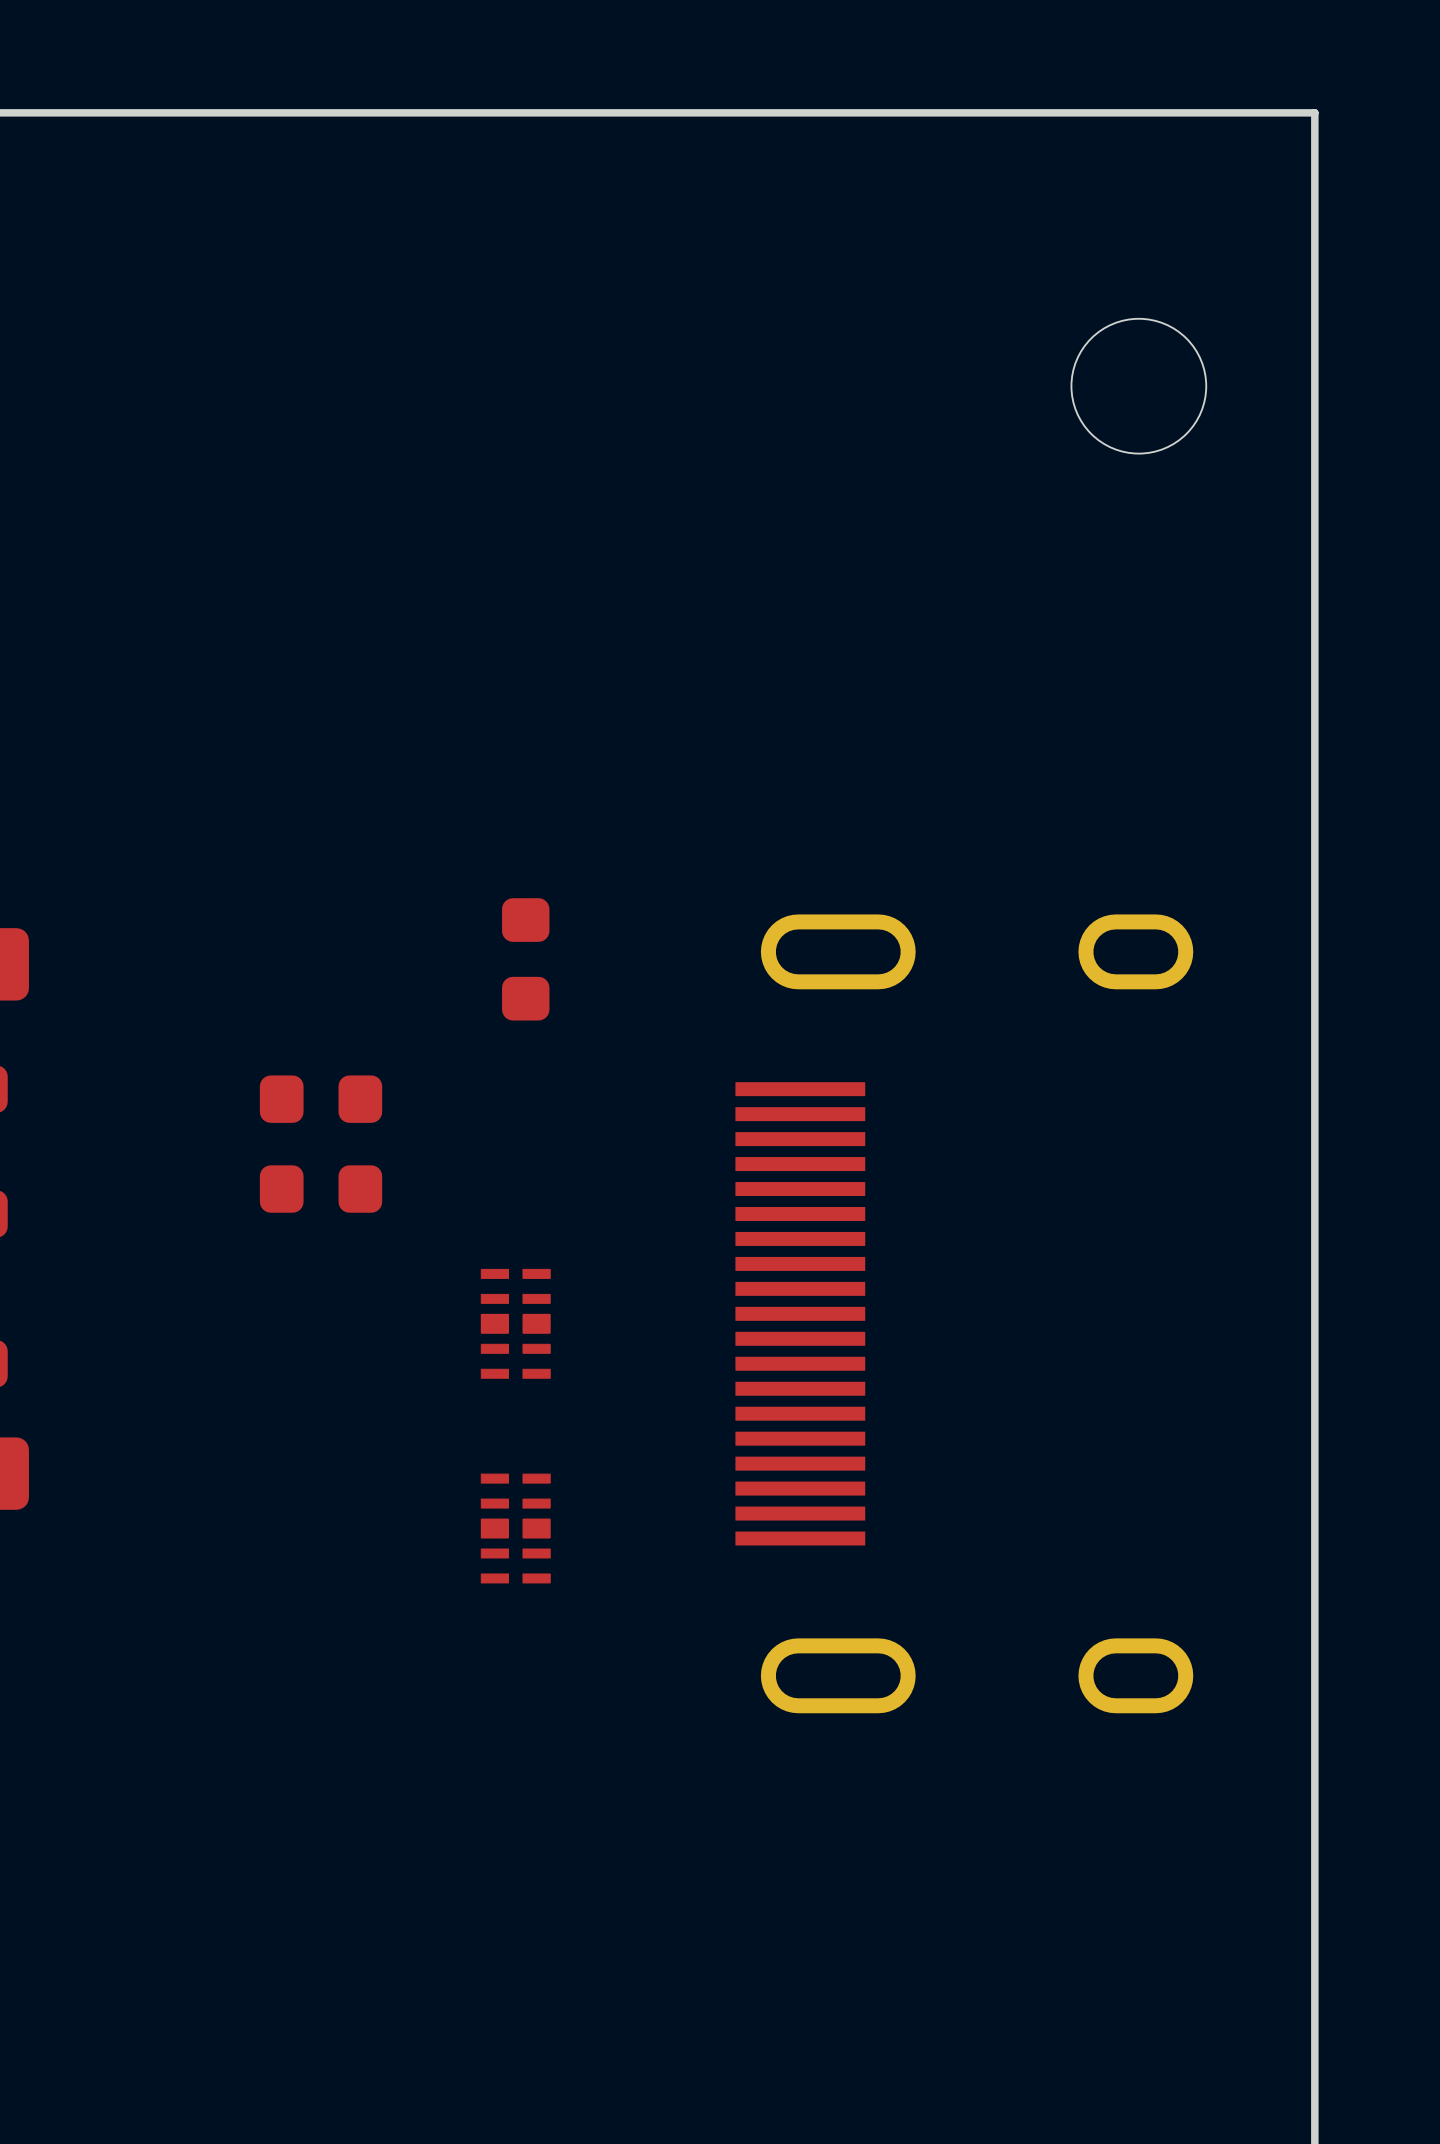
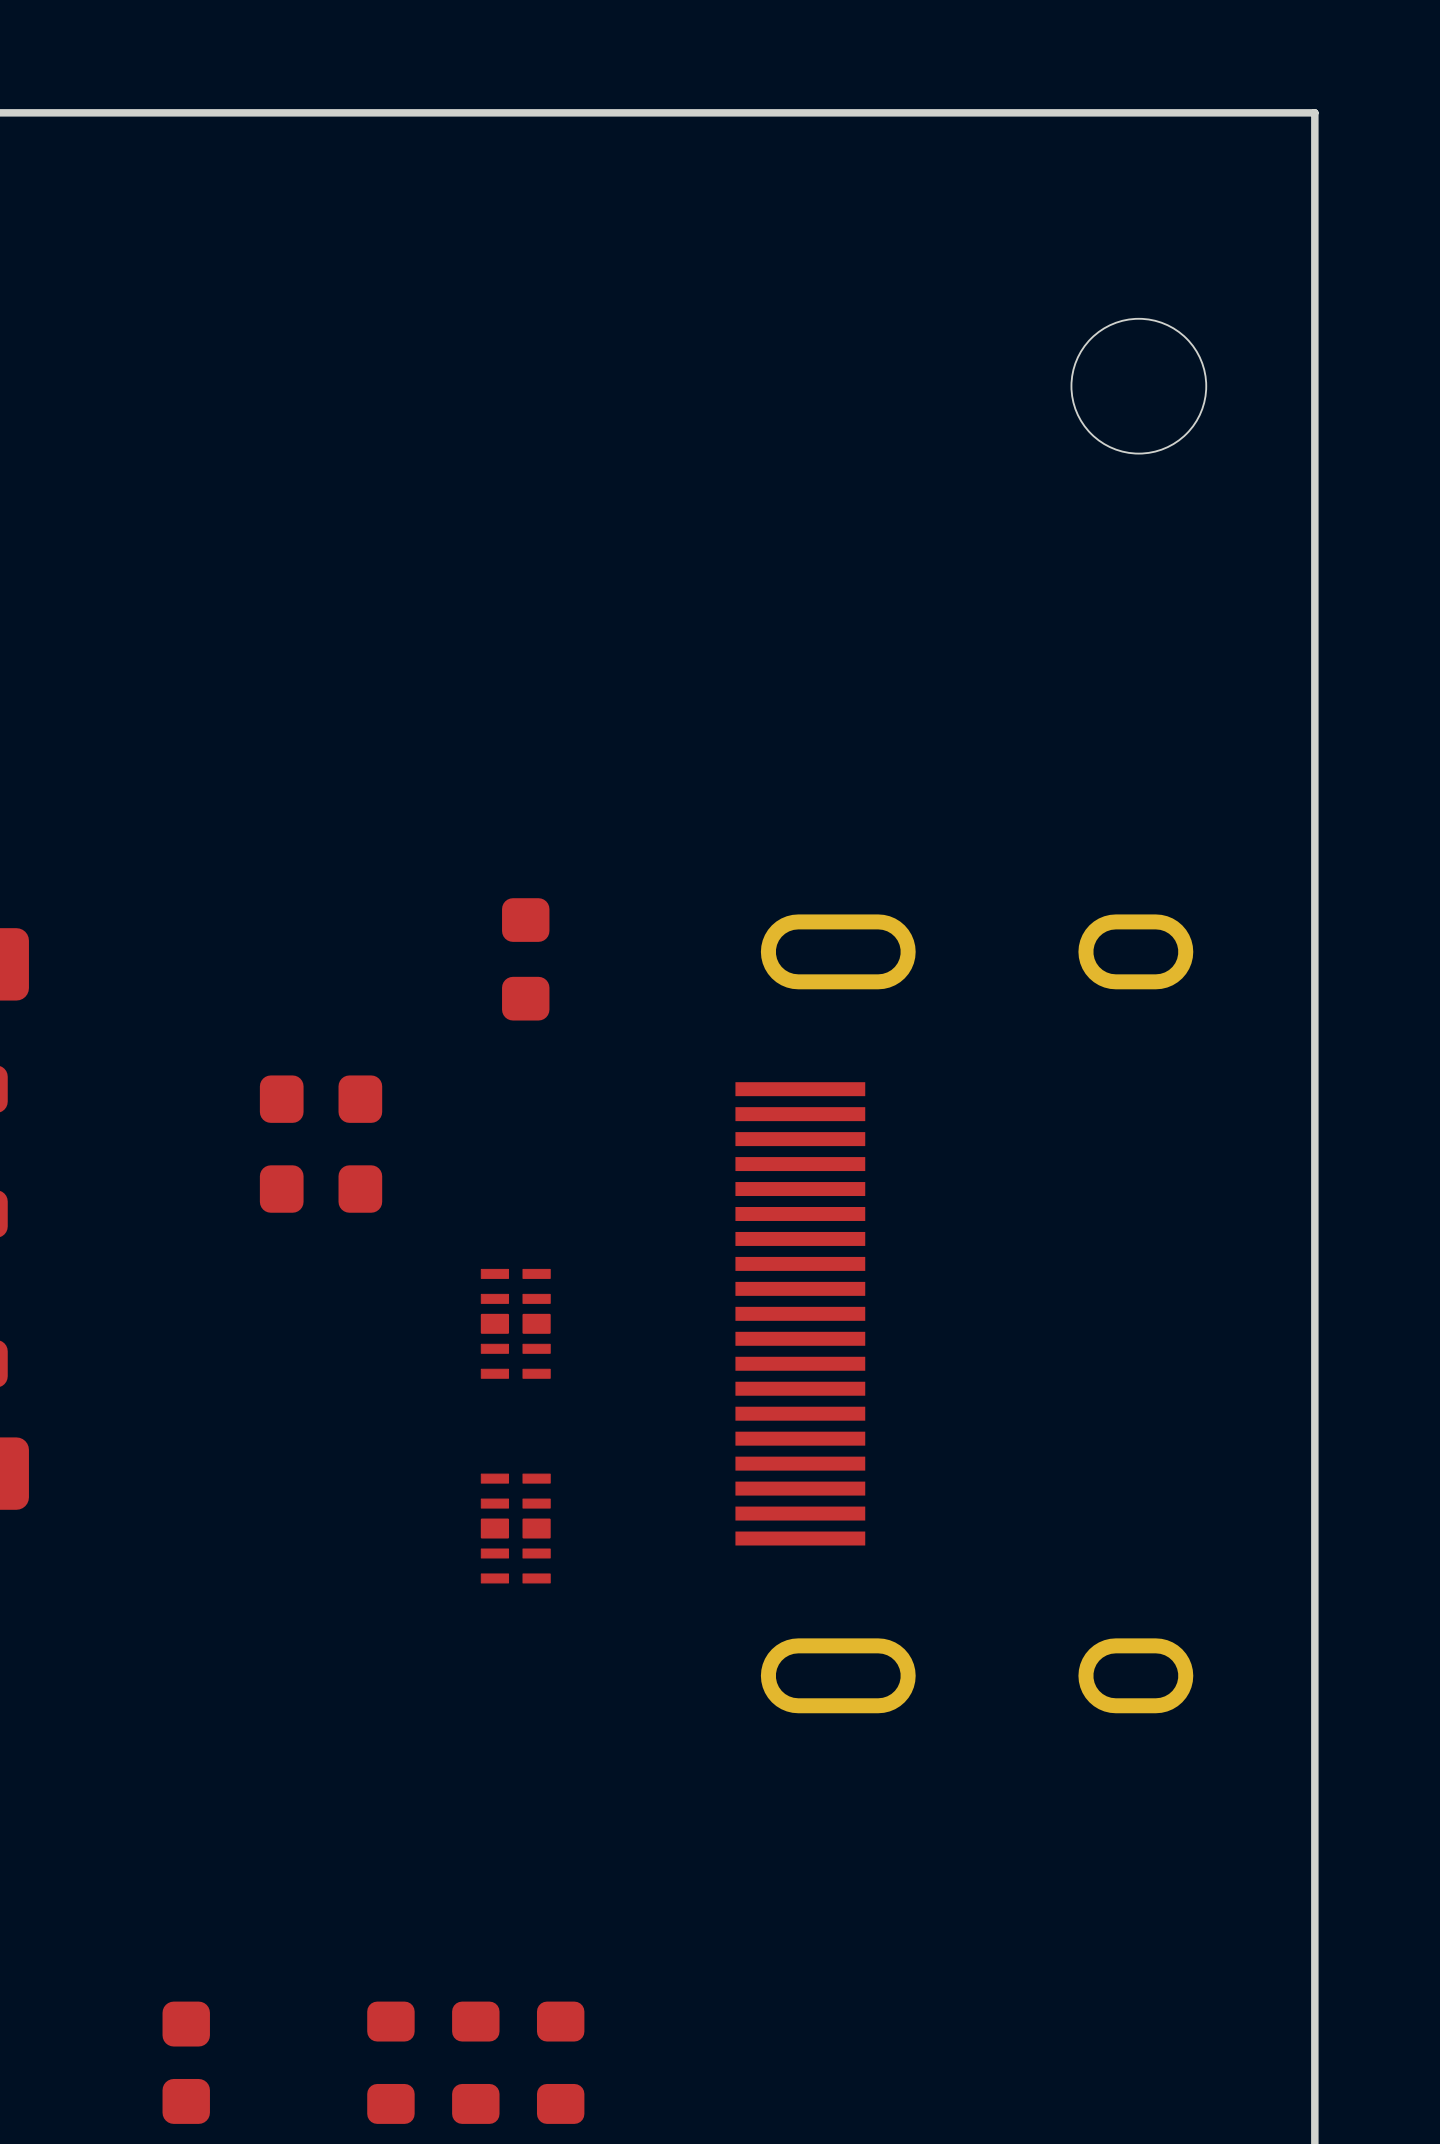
part: none -> (186, 2062)
part: none -> (390, 2062)
part: none -> (475, 2062)
part: none -> (560, 2062)

